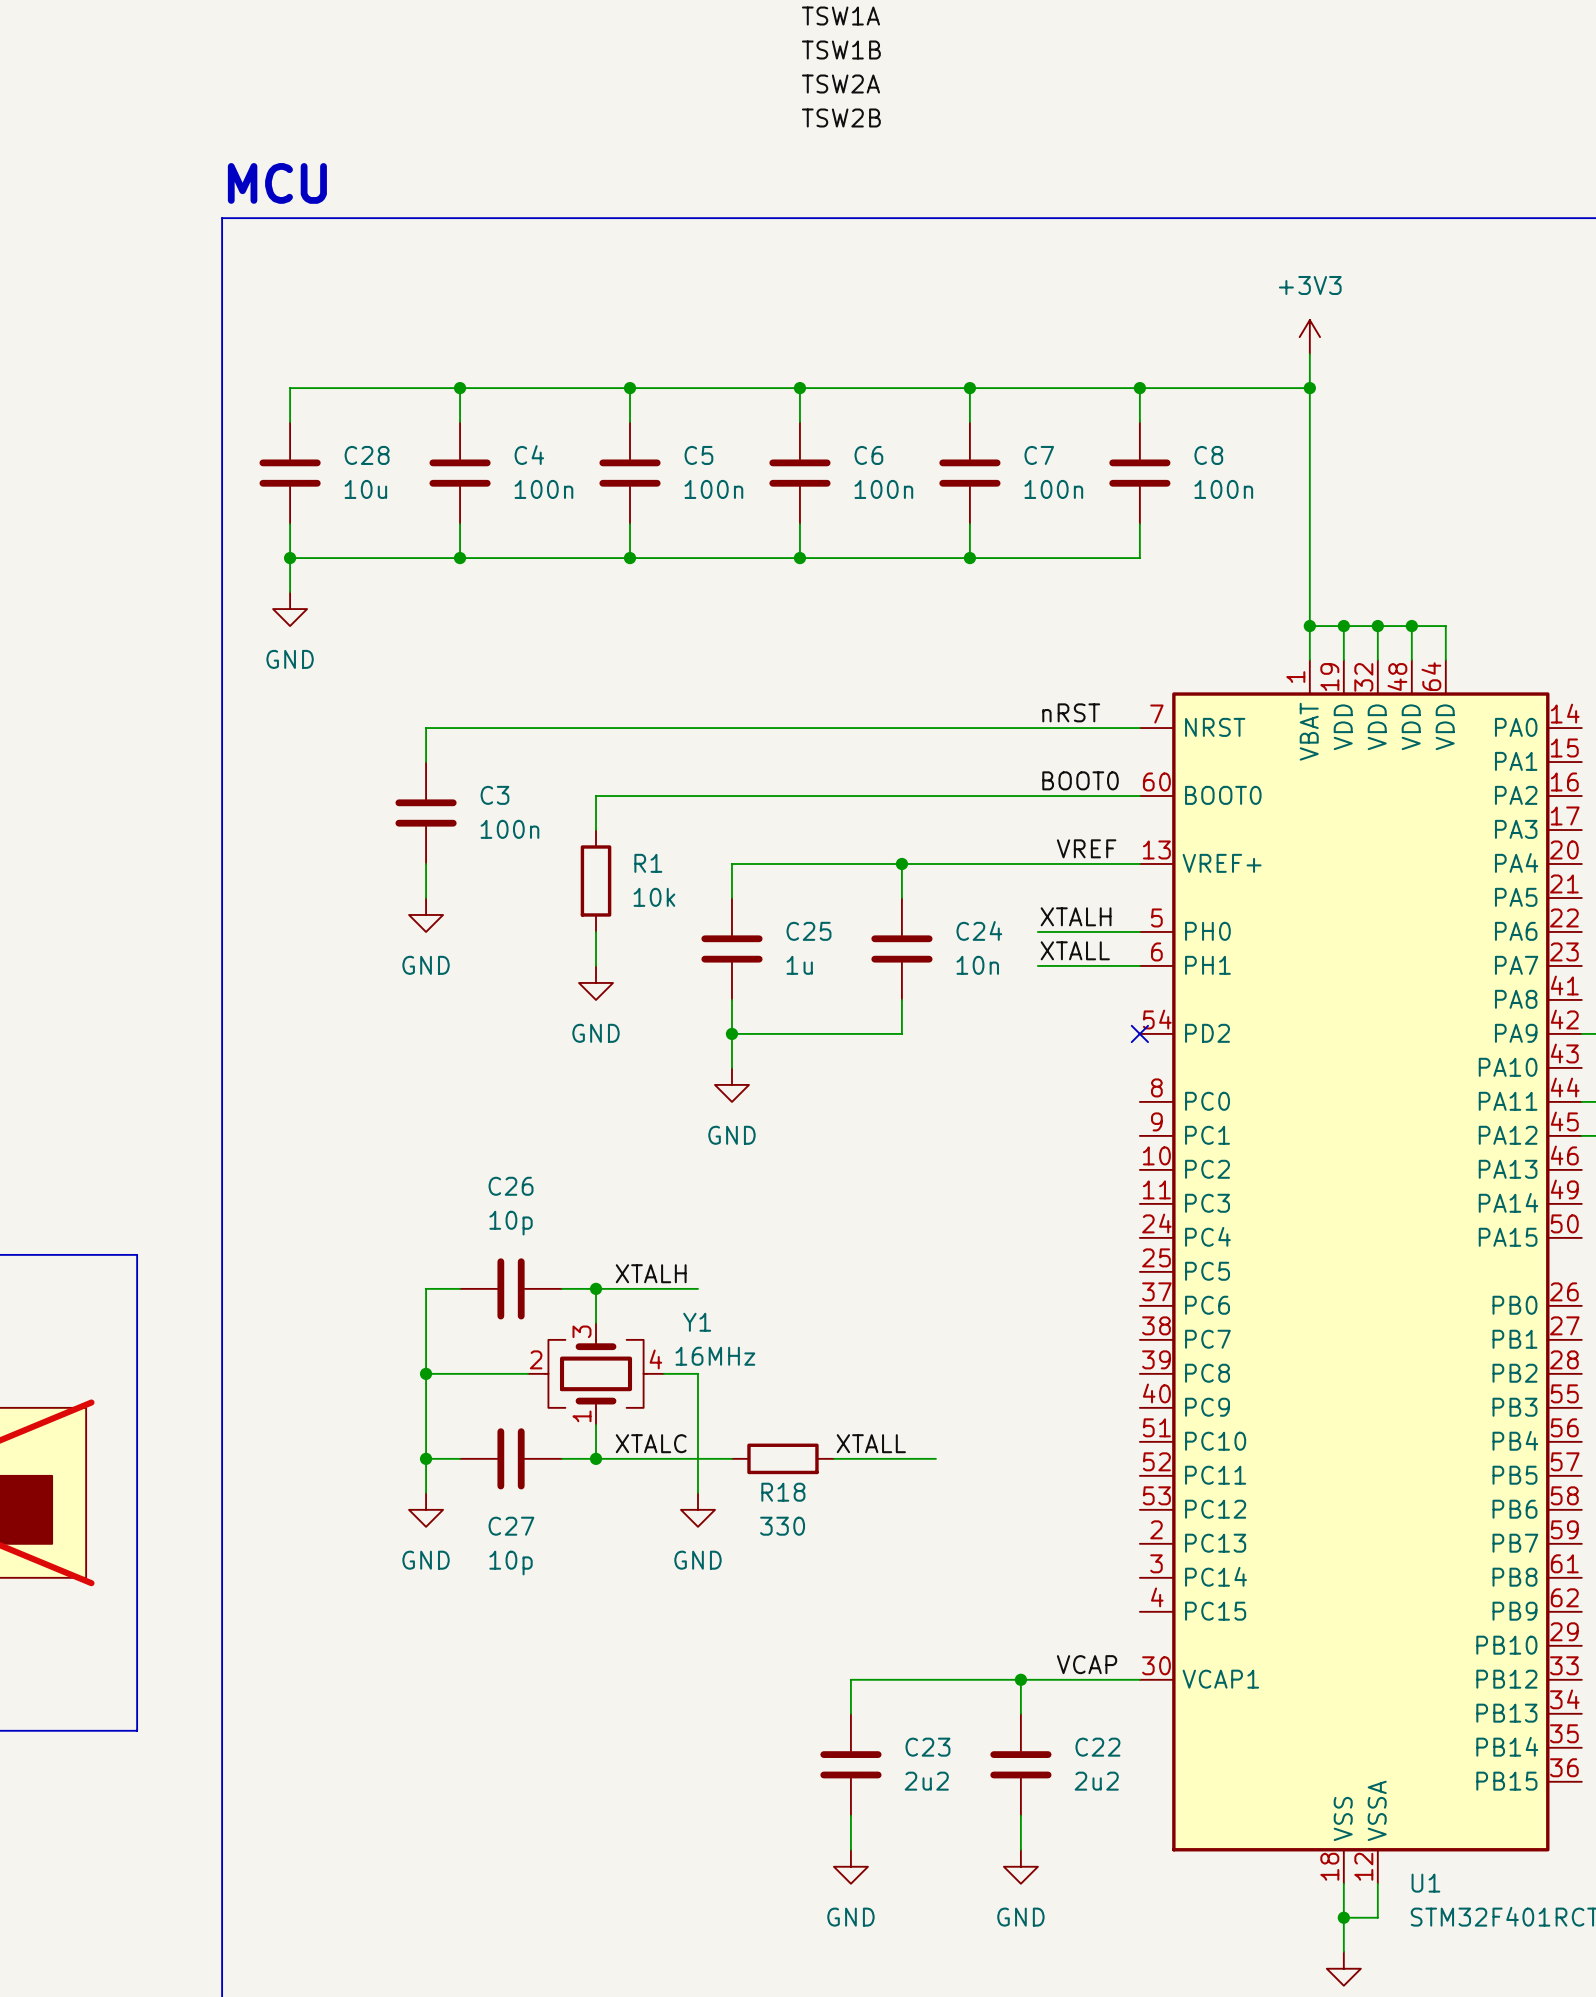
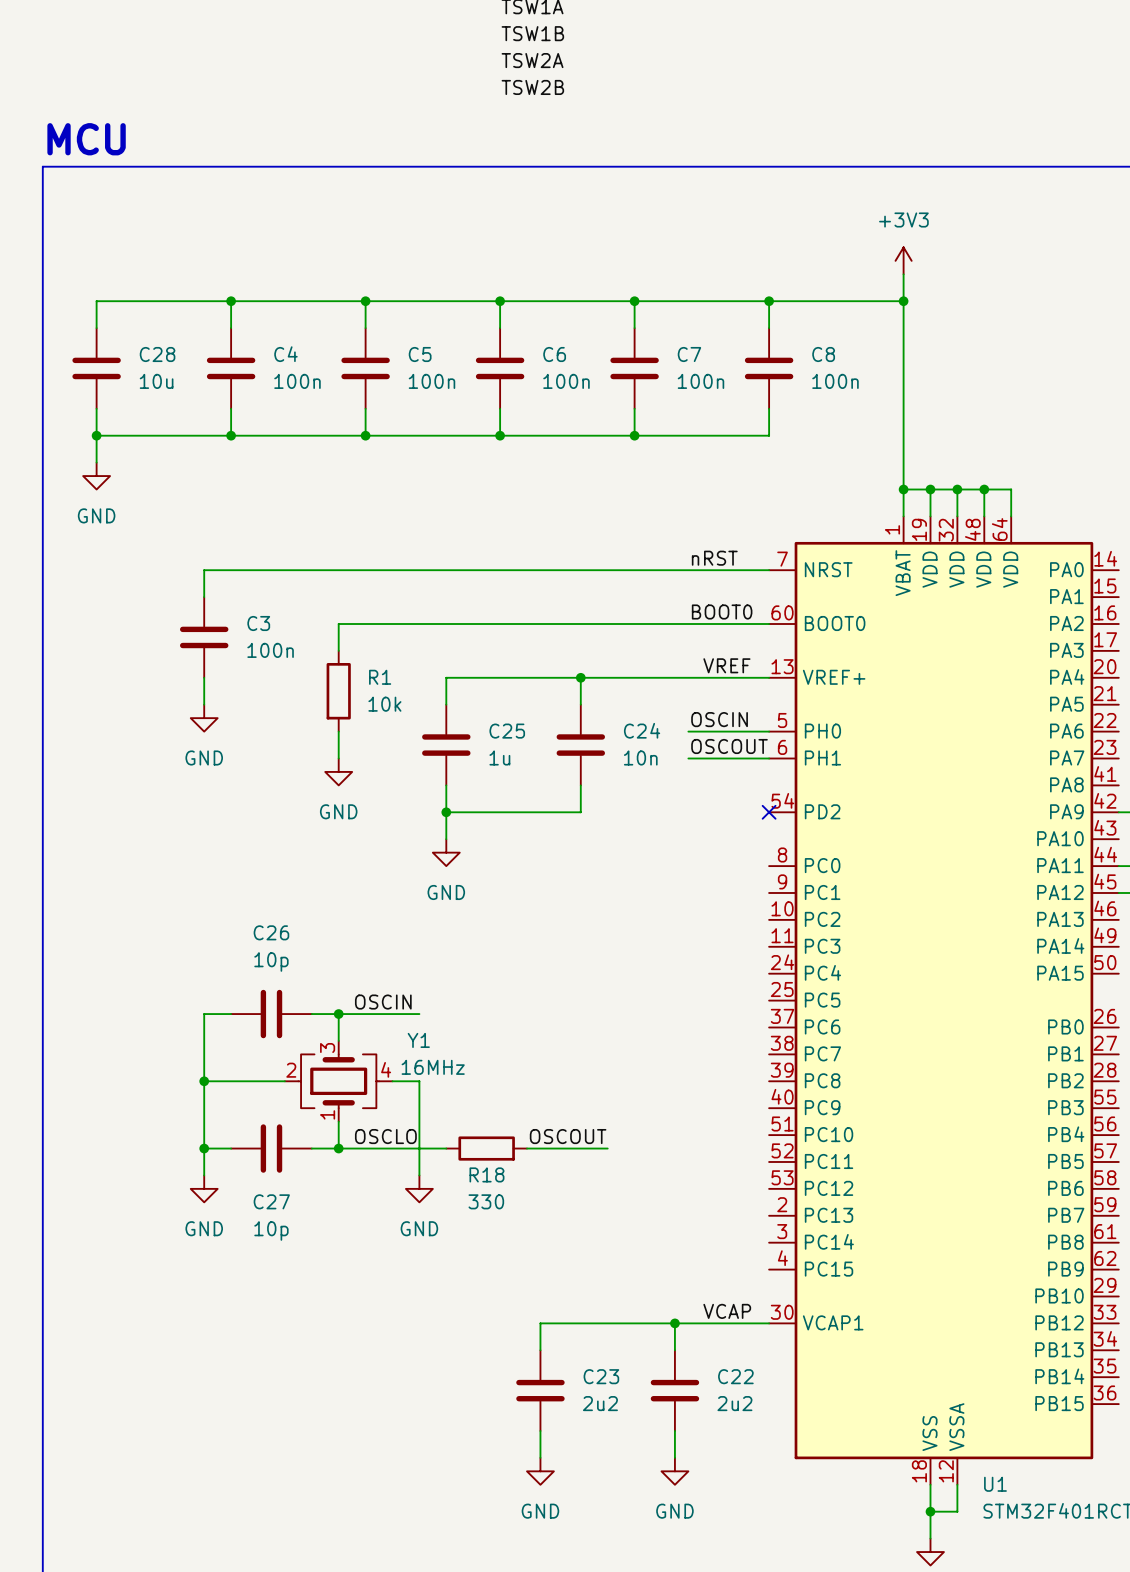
label: XTALH (1076, 916) -> OSCIN (719, 719)
label: XTALL (1075, 950) -> OSCOUT (729, 746)
label: XTALH (651, 1273) -> OSCIN (383, 1002)
label: XTALC (651, 1443) -> OSCLO (385, 1136)
label: XTALL (871, 1443) -> OSCOUT (568, 1136)

